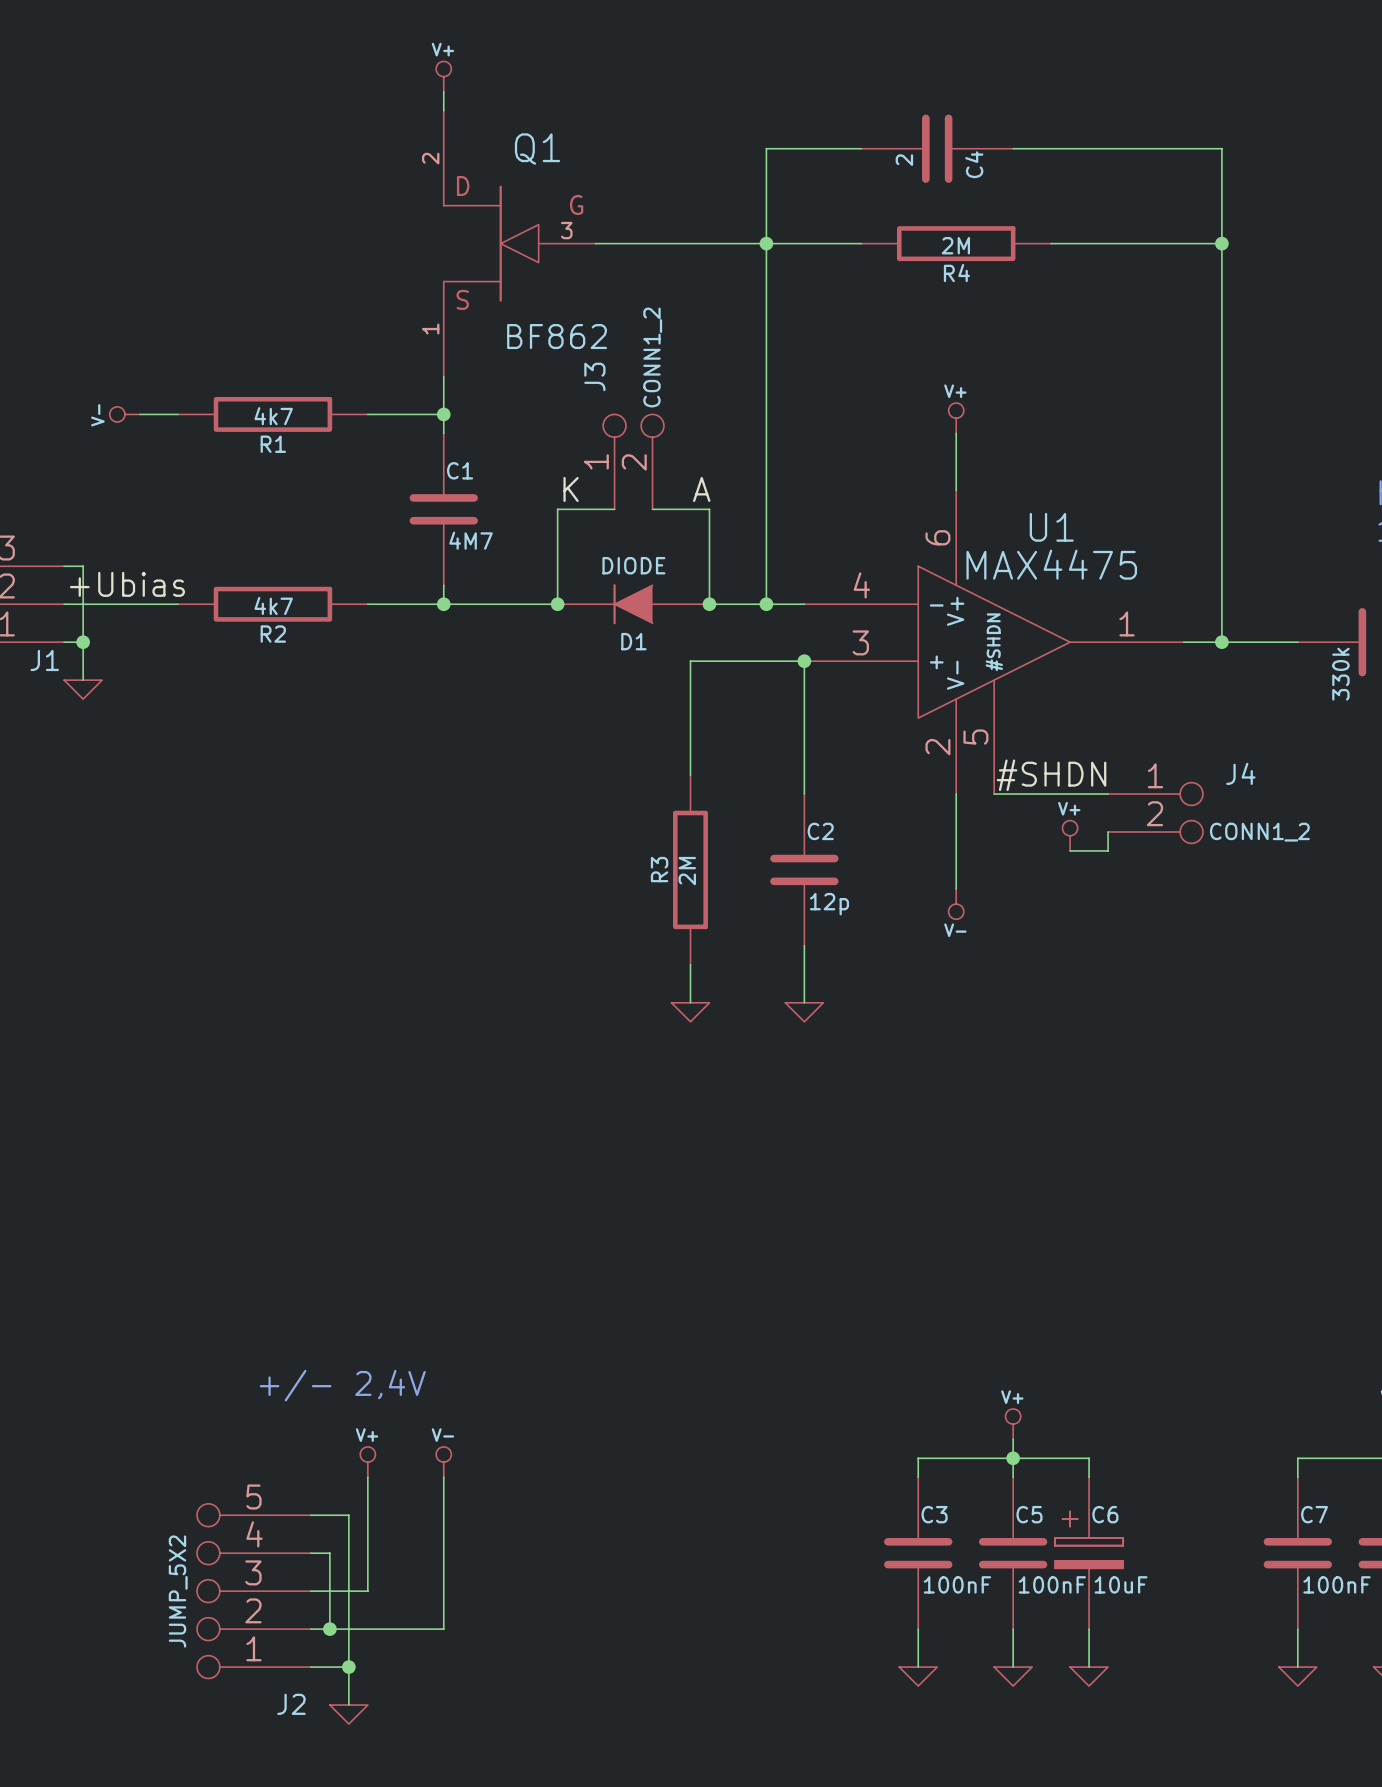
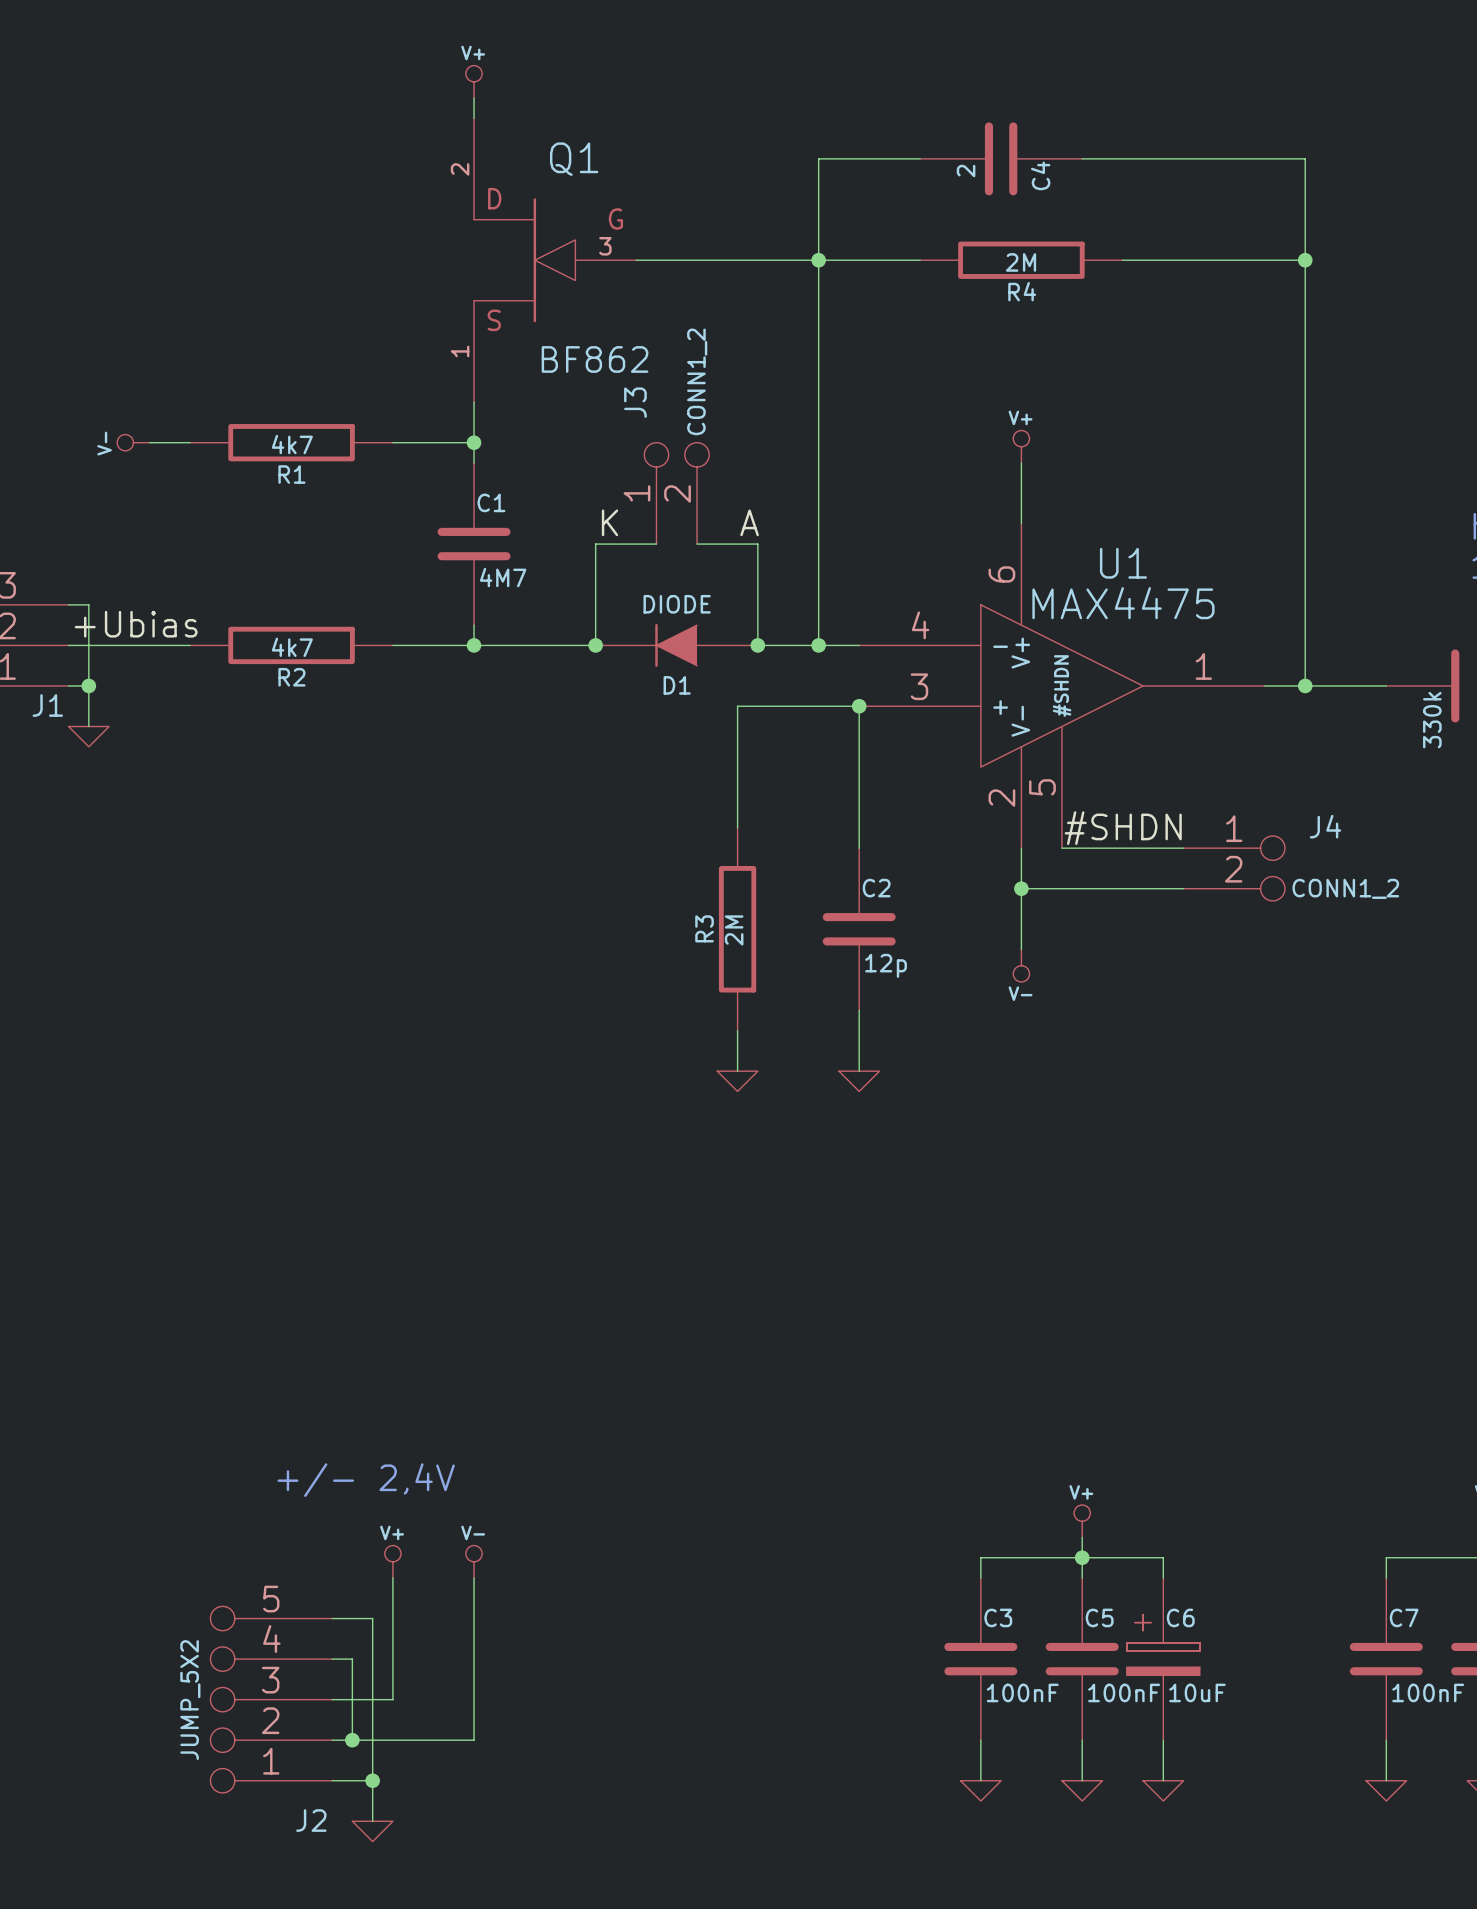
junction: none -> (1021, 888)
wire: (1108, 831) (1108, 850) (1070, 850) -> (1183, 888) (1021, 888)
power symbol: V+ (1070, 835) -> none

